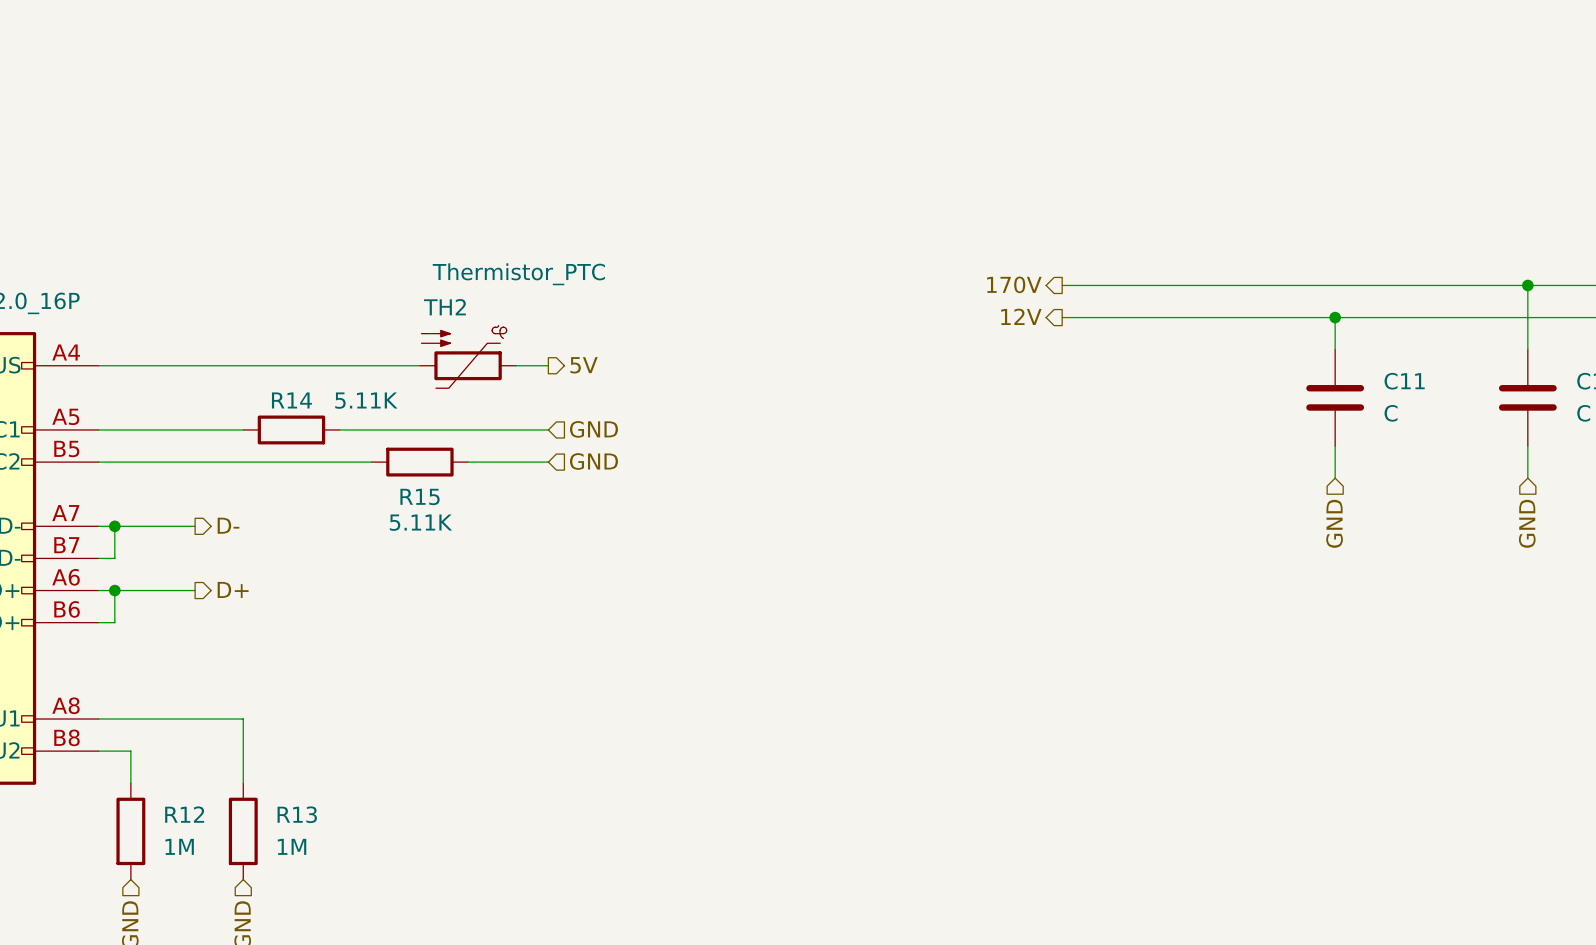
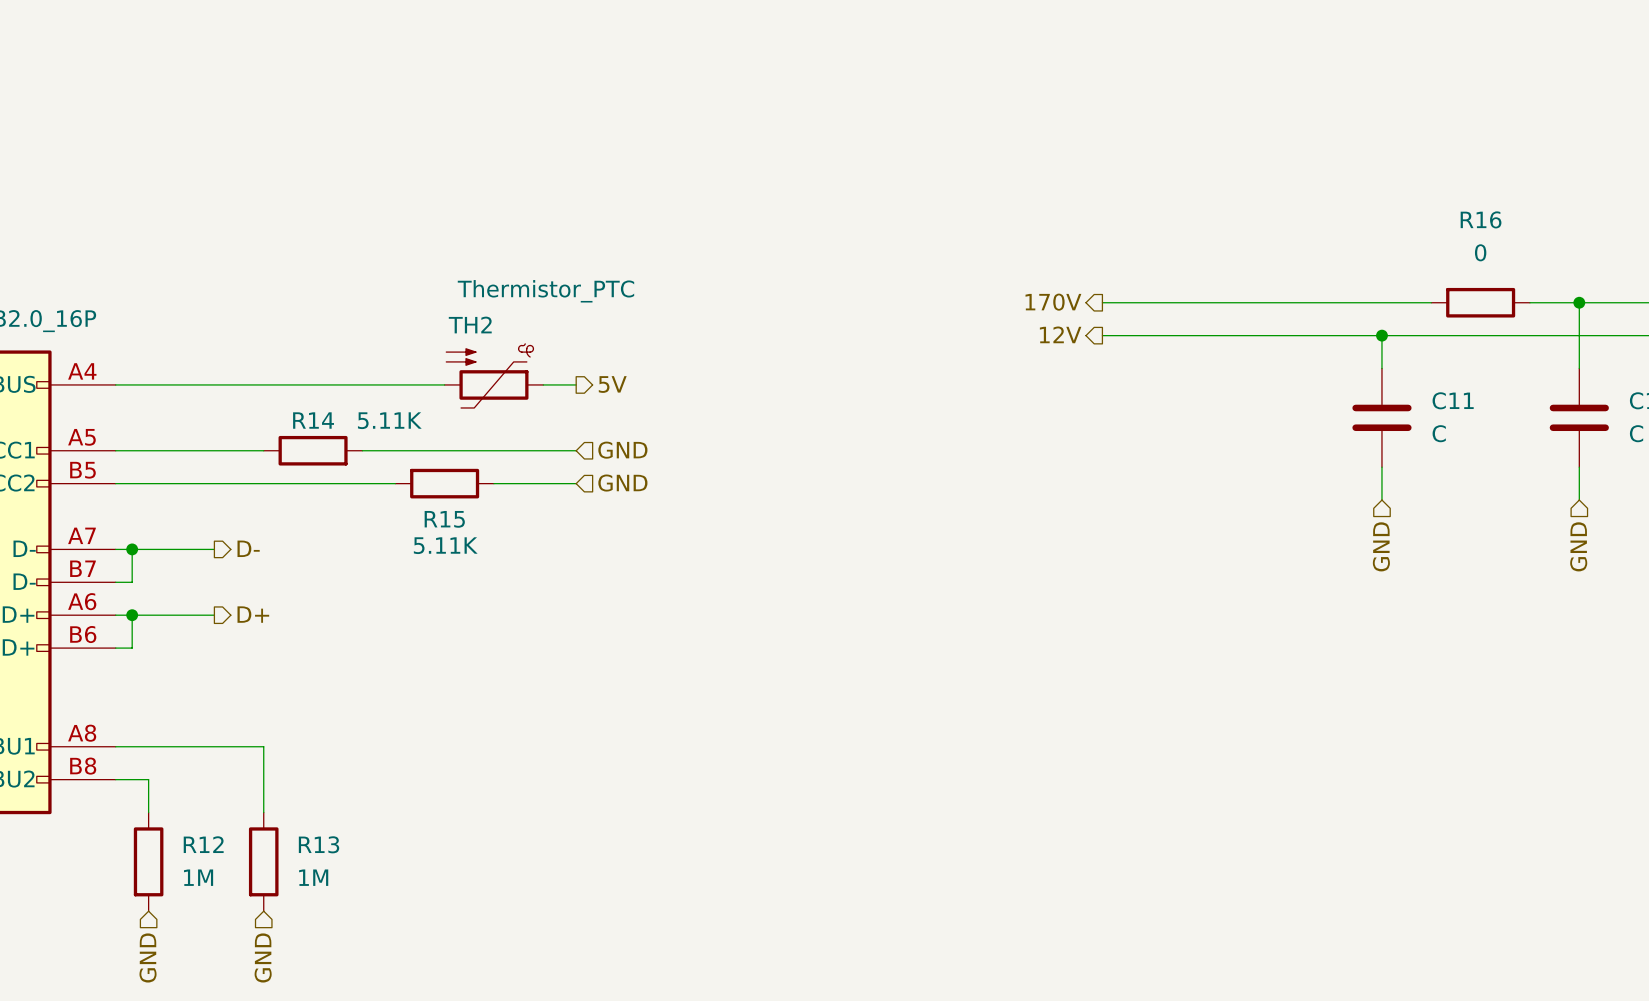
wire: (1383, 285) (1479, 285) -> none
R16: none -> 0 (1480, 302)

